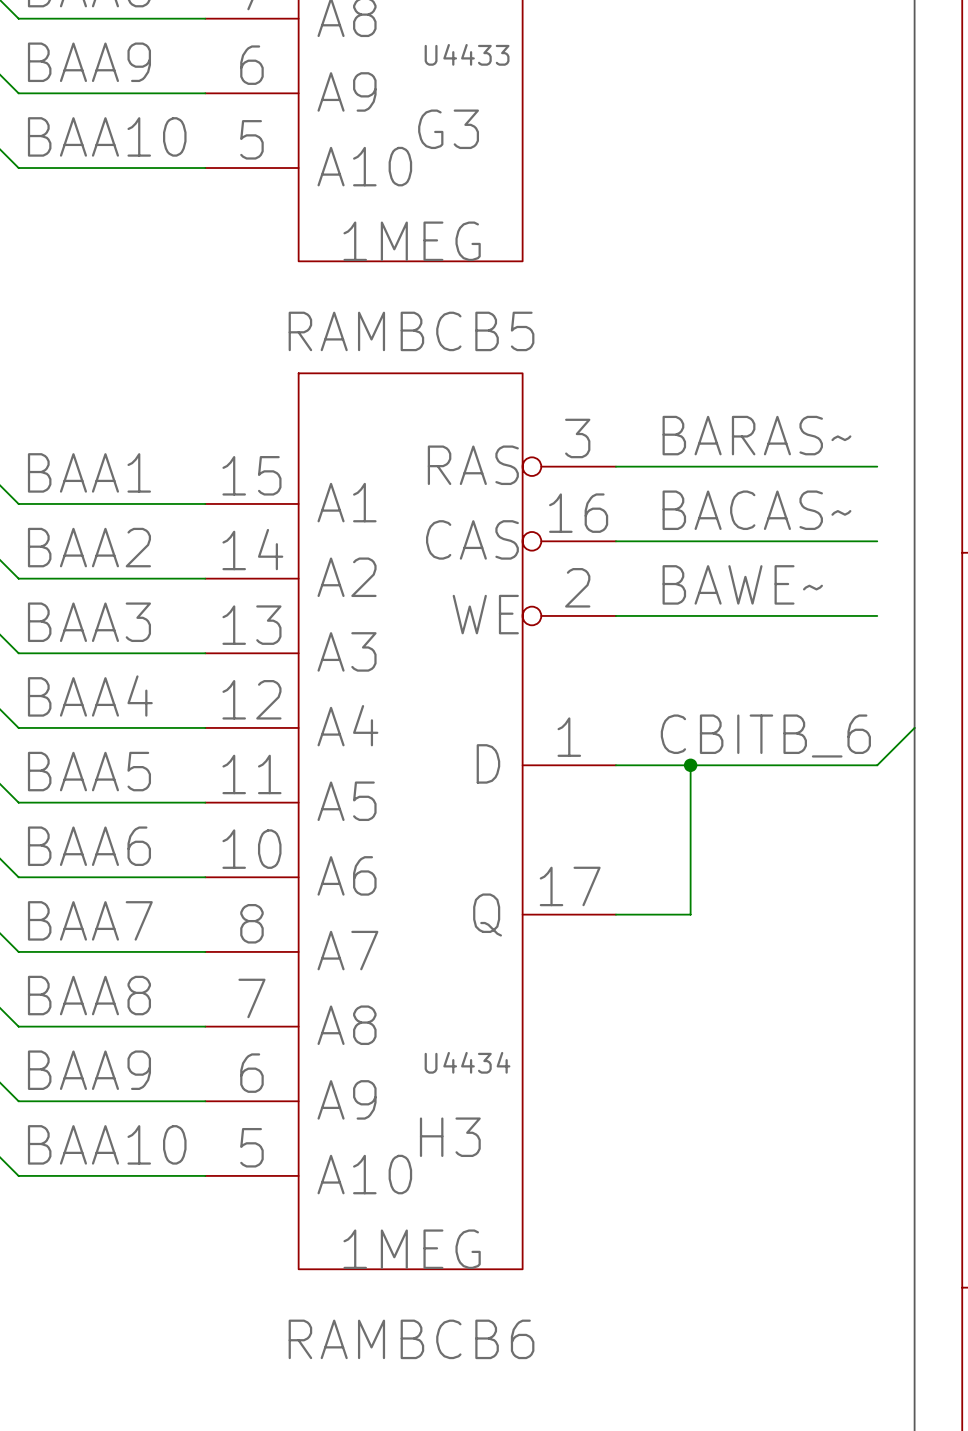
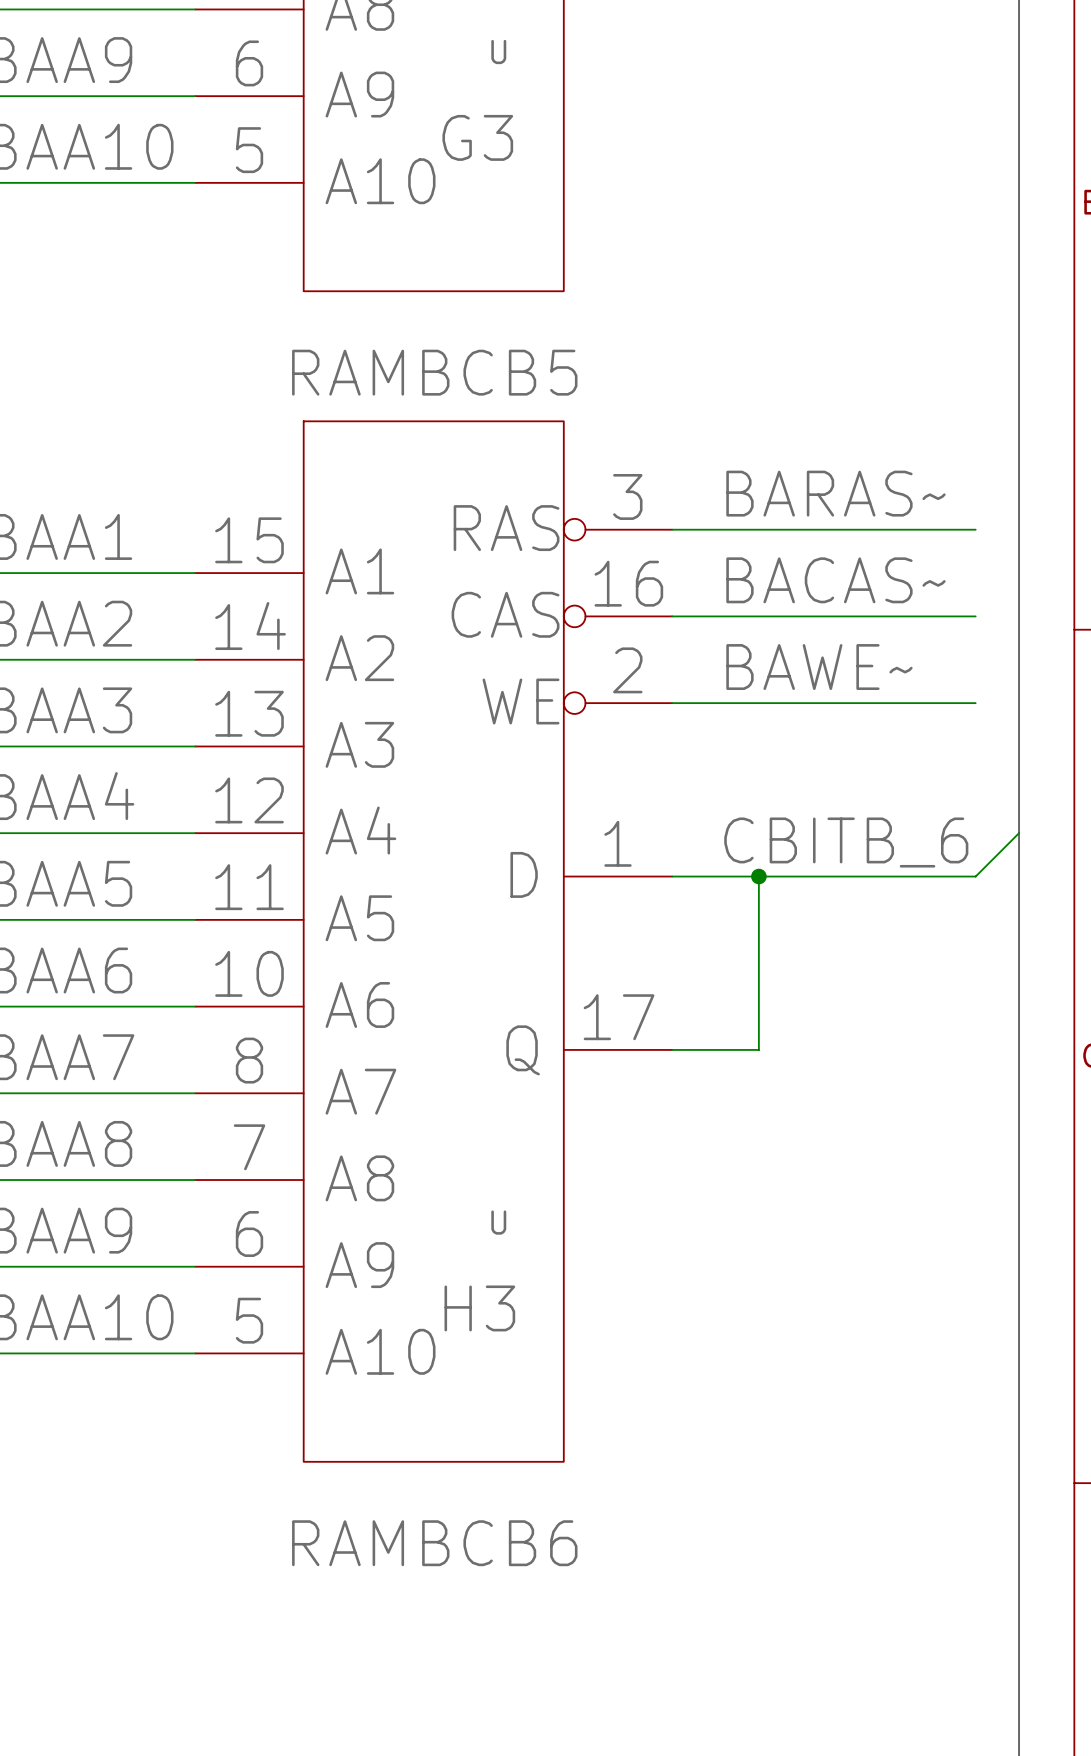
U4433 name: U4433 (467, 54) -> U (498, 52)
U4433 value: 1MEG (412, 241) -> none
U4434 name: U4434 (467, 1062) -> U (498, 1222)
U4434 value: 1MEG (412, 1249) -> none

